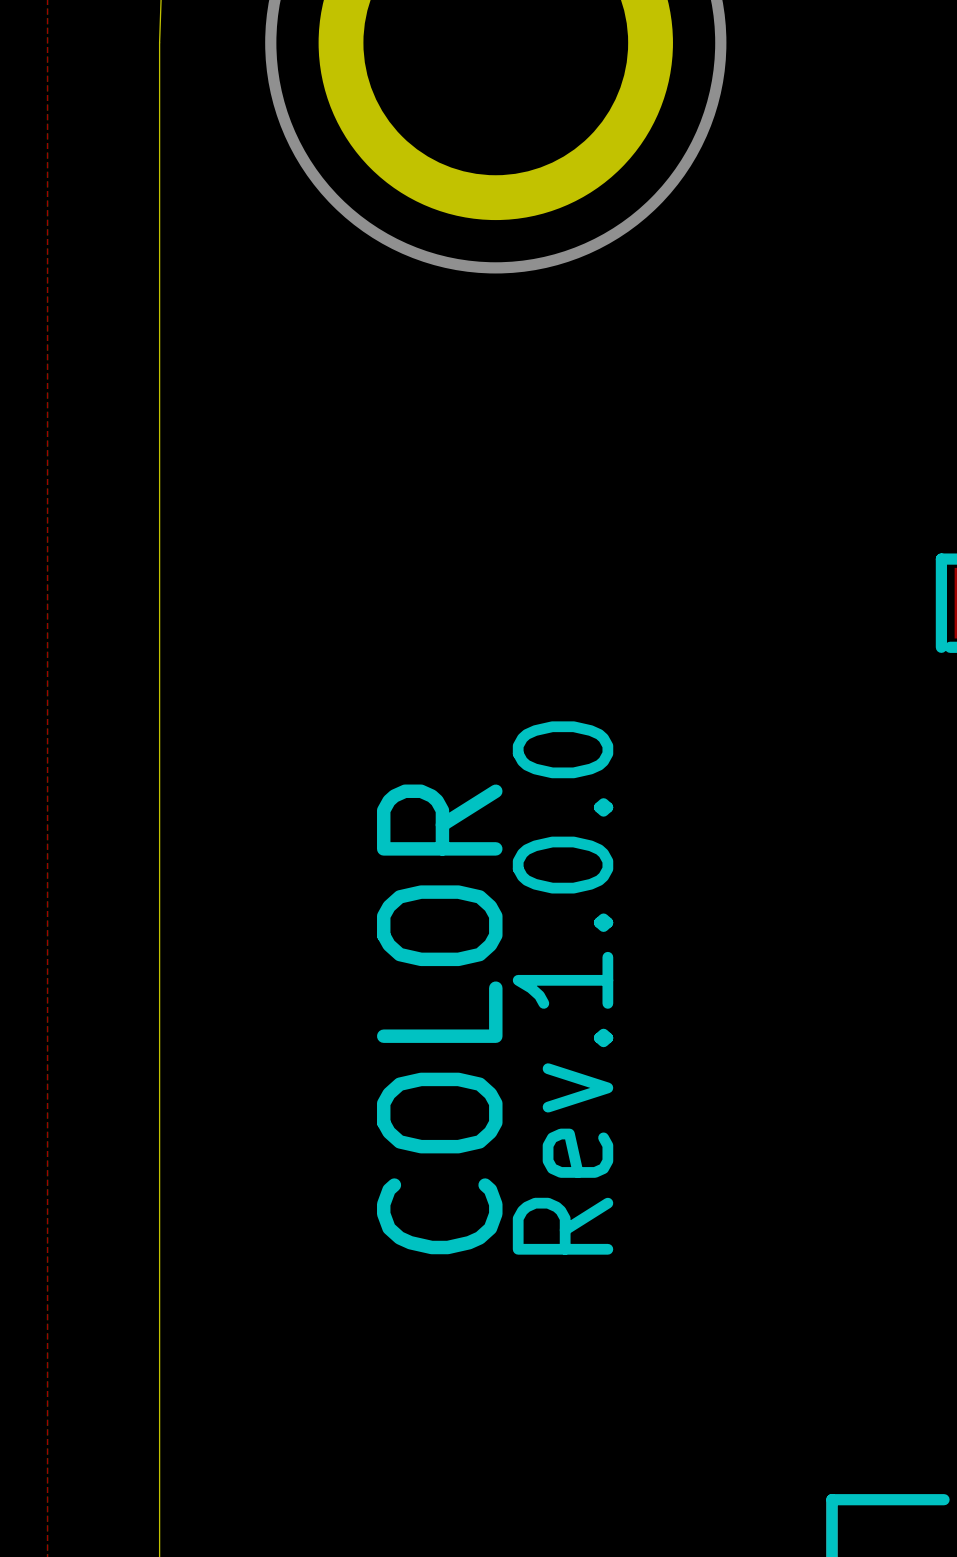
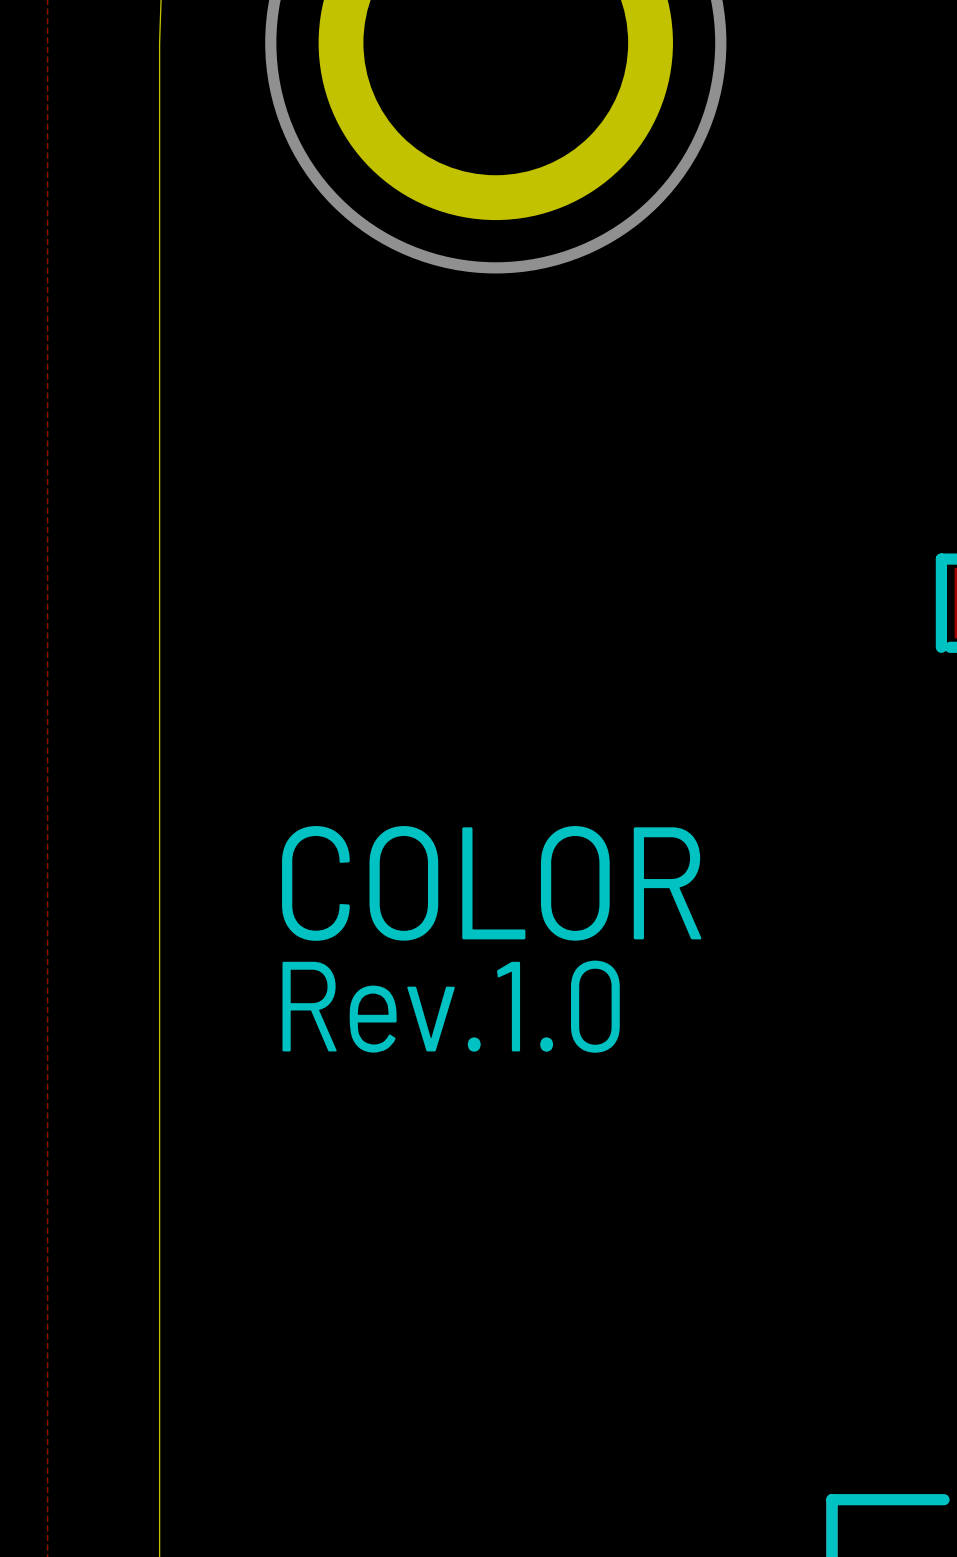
text: Rev.1.0.0 (563, 988) -> Rev.1.0 (451, 1006)
text rotation: 0° (439, 1019) -> 90° clockwise (491, 883)

